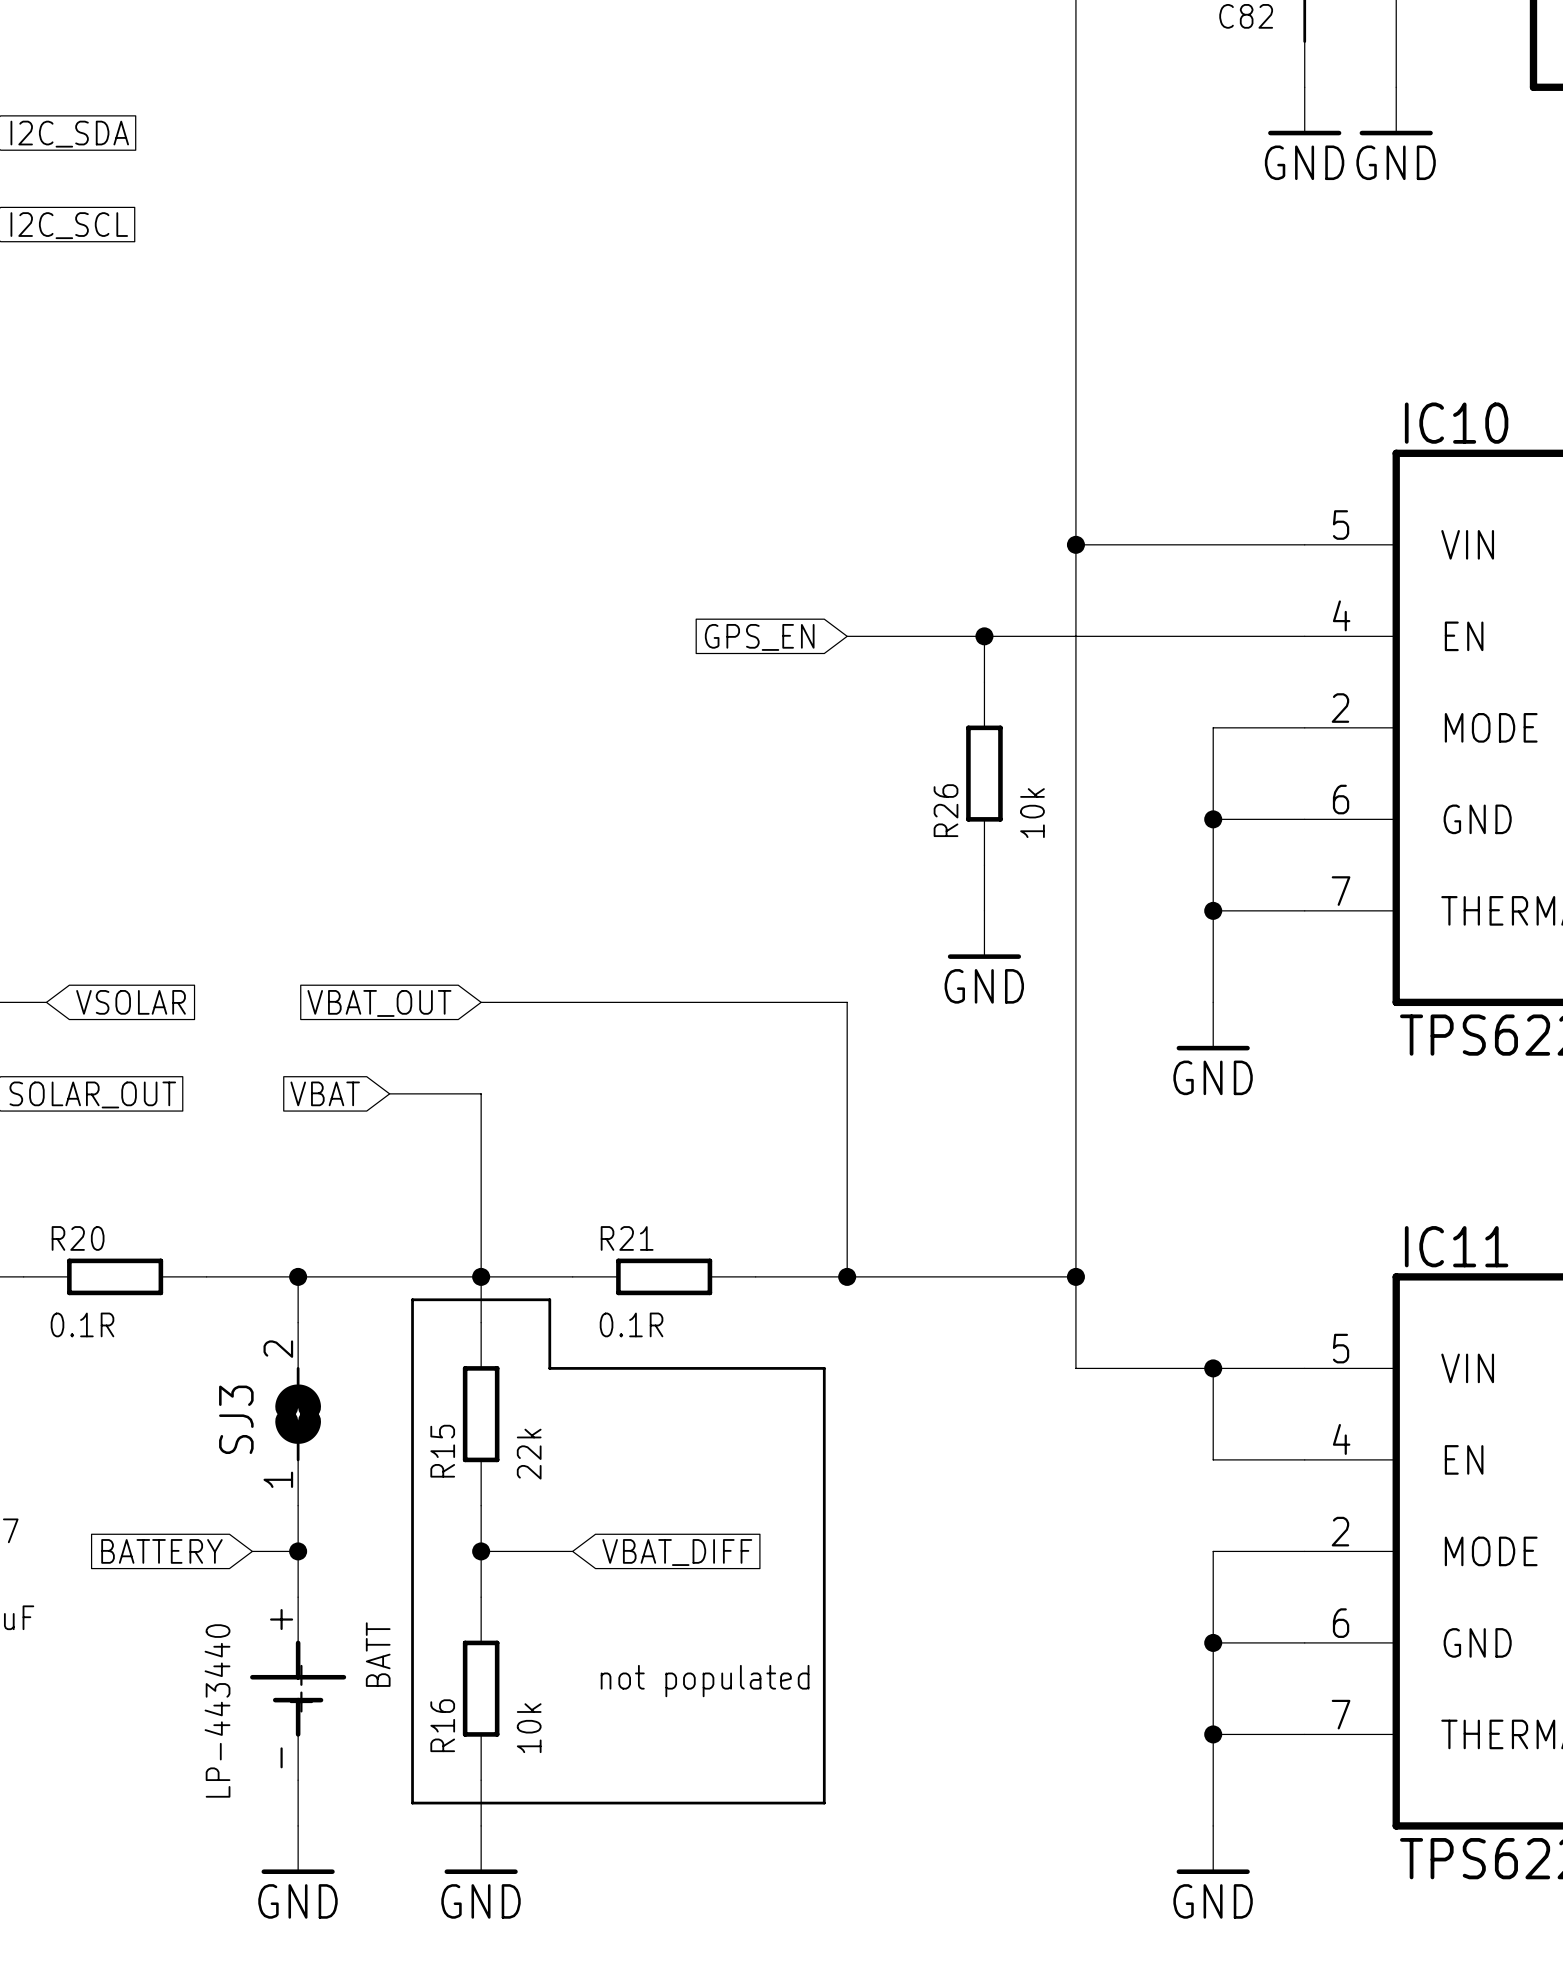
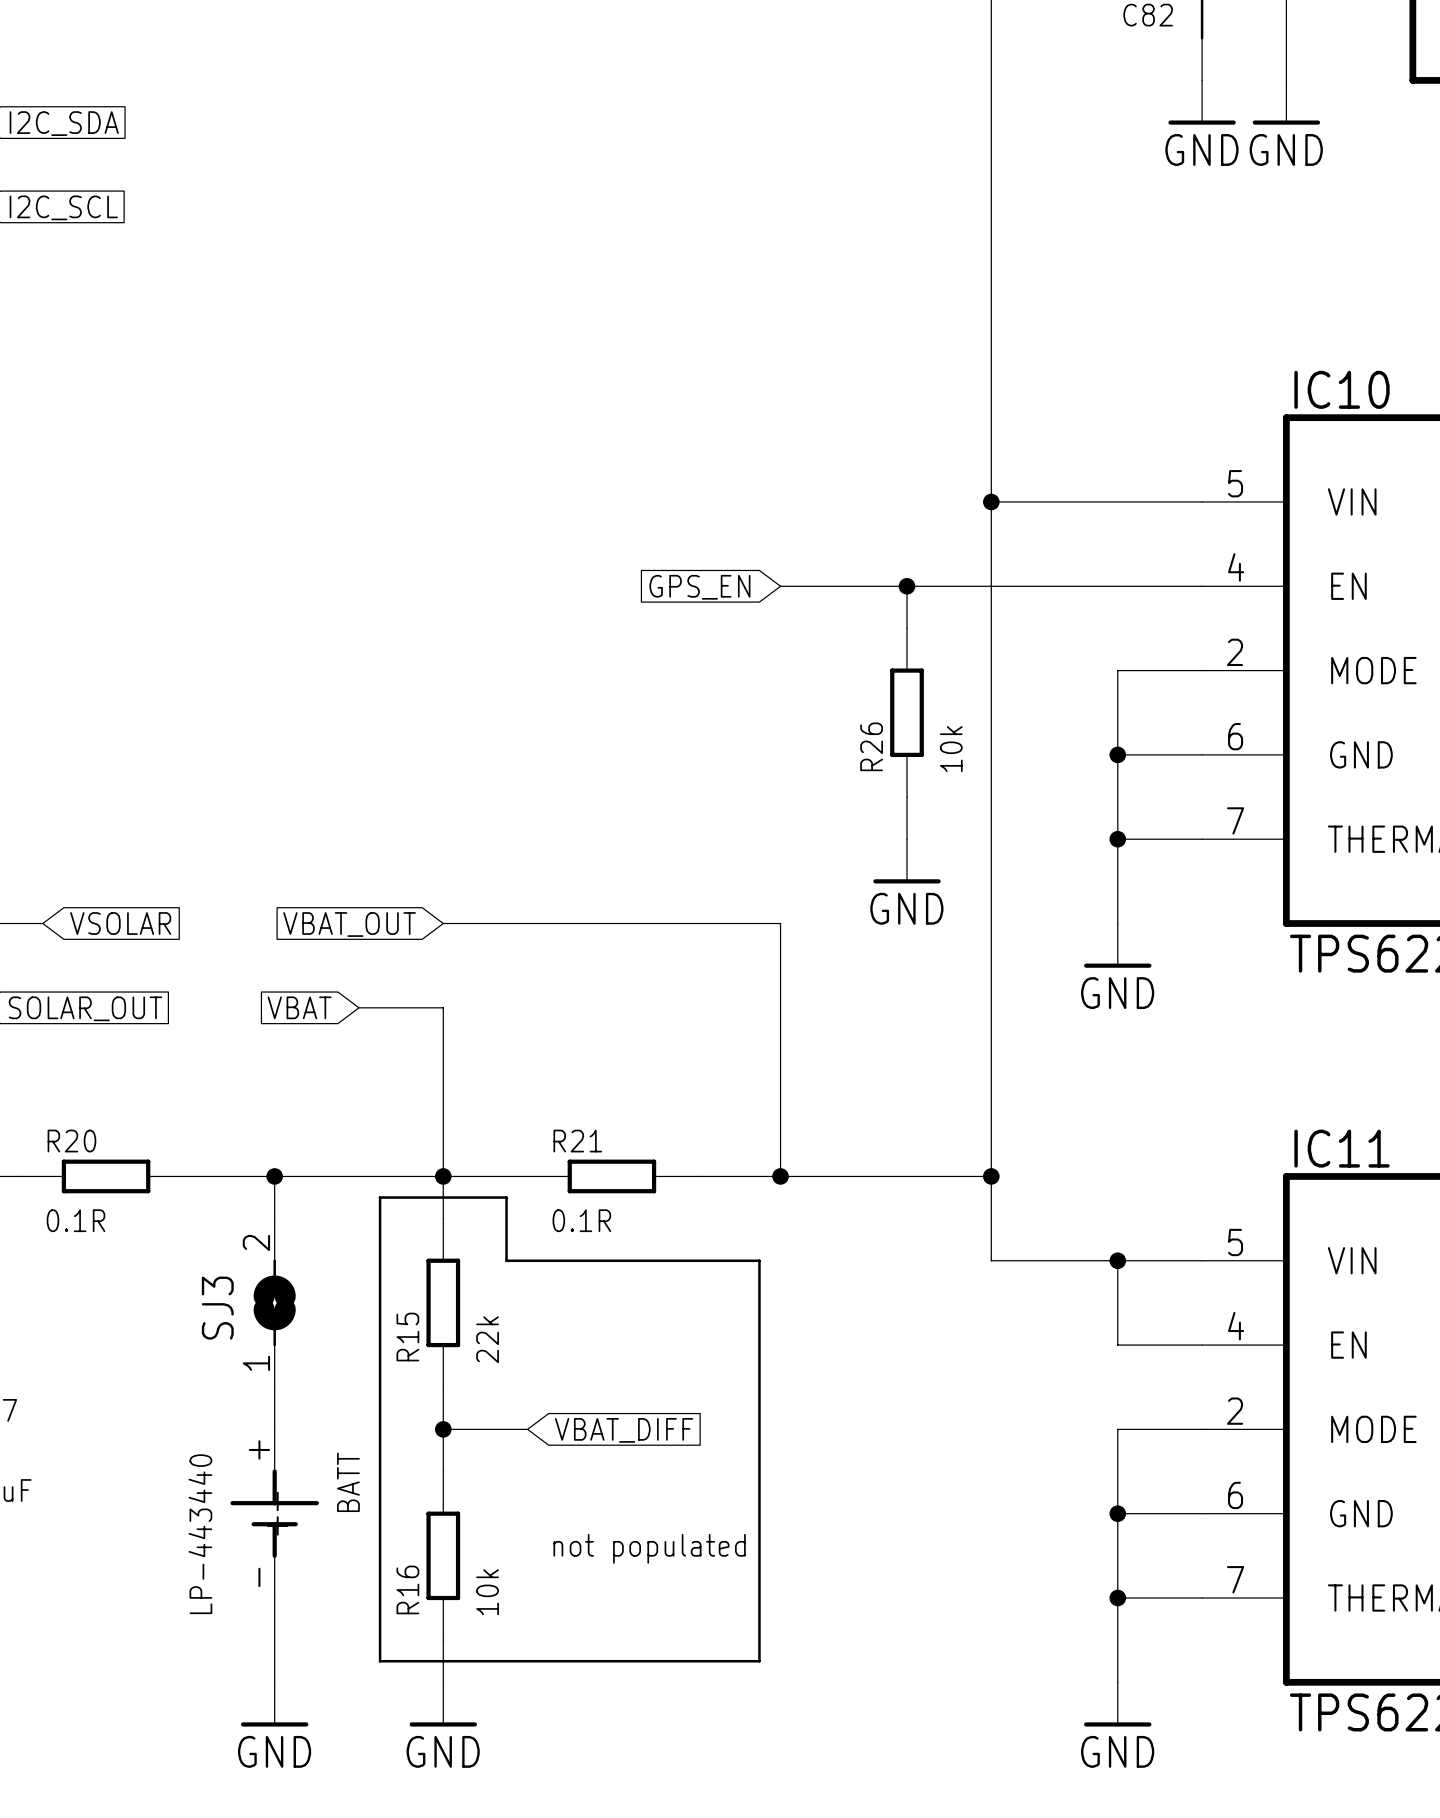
global label: BATTERY (161, 1551) -> none
wire: (252, 1551) (298, 1551) (298, 1597) -> none
junction: (298, 1551) -> none
BATT position: (298, 1688) -> (274, 1513)

